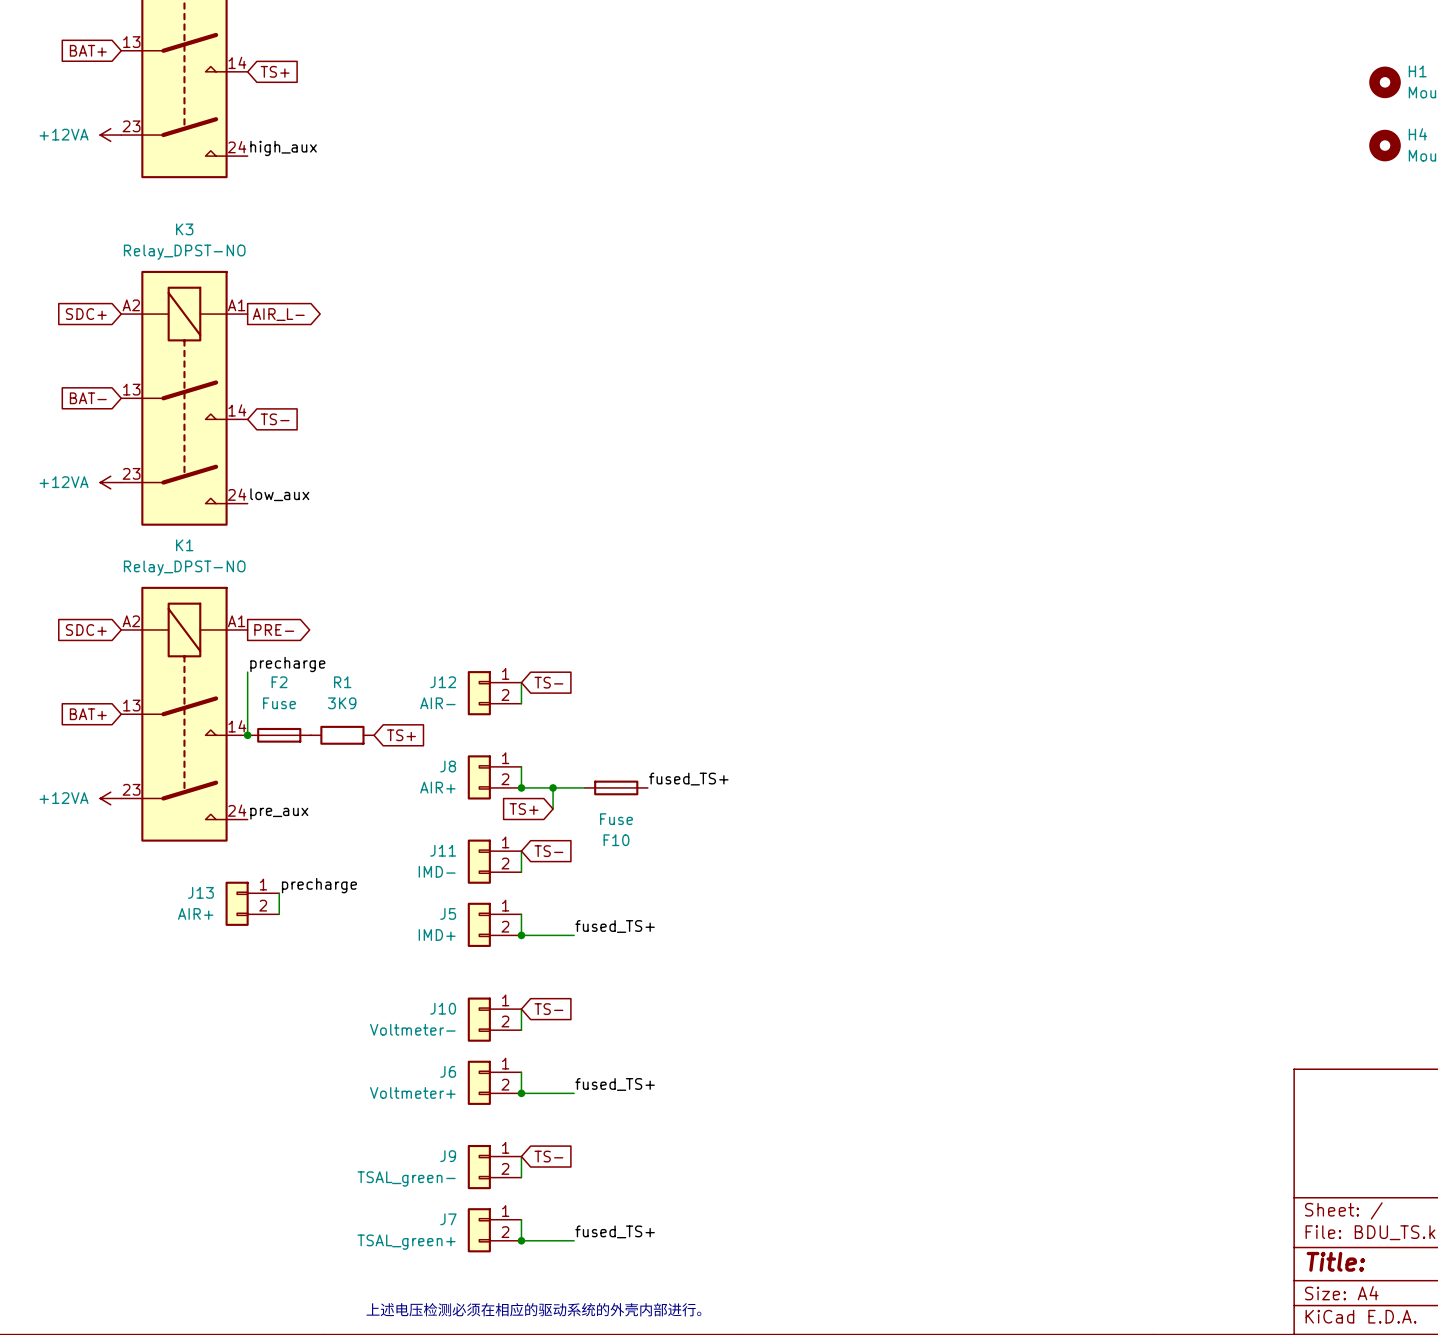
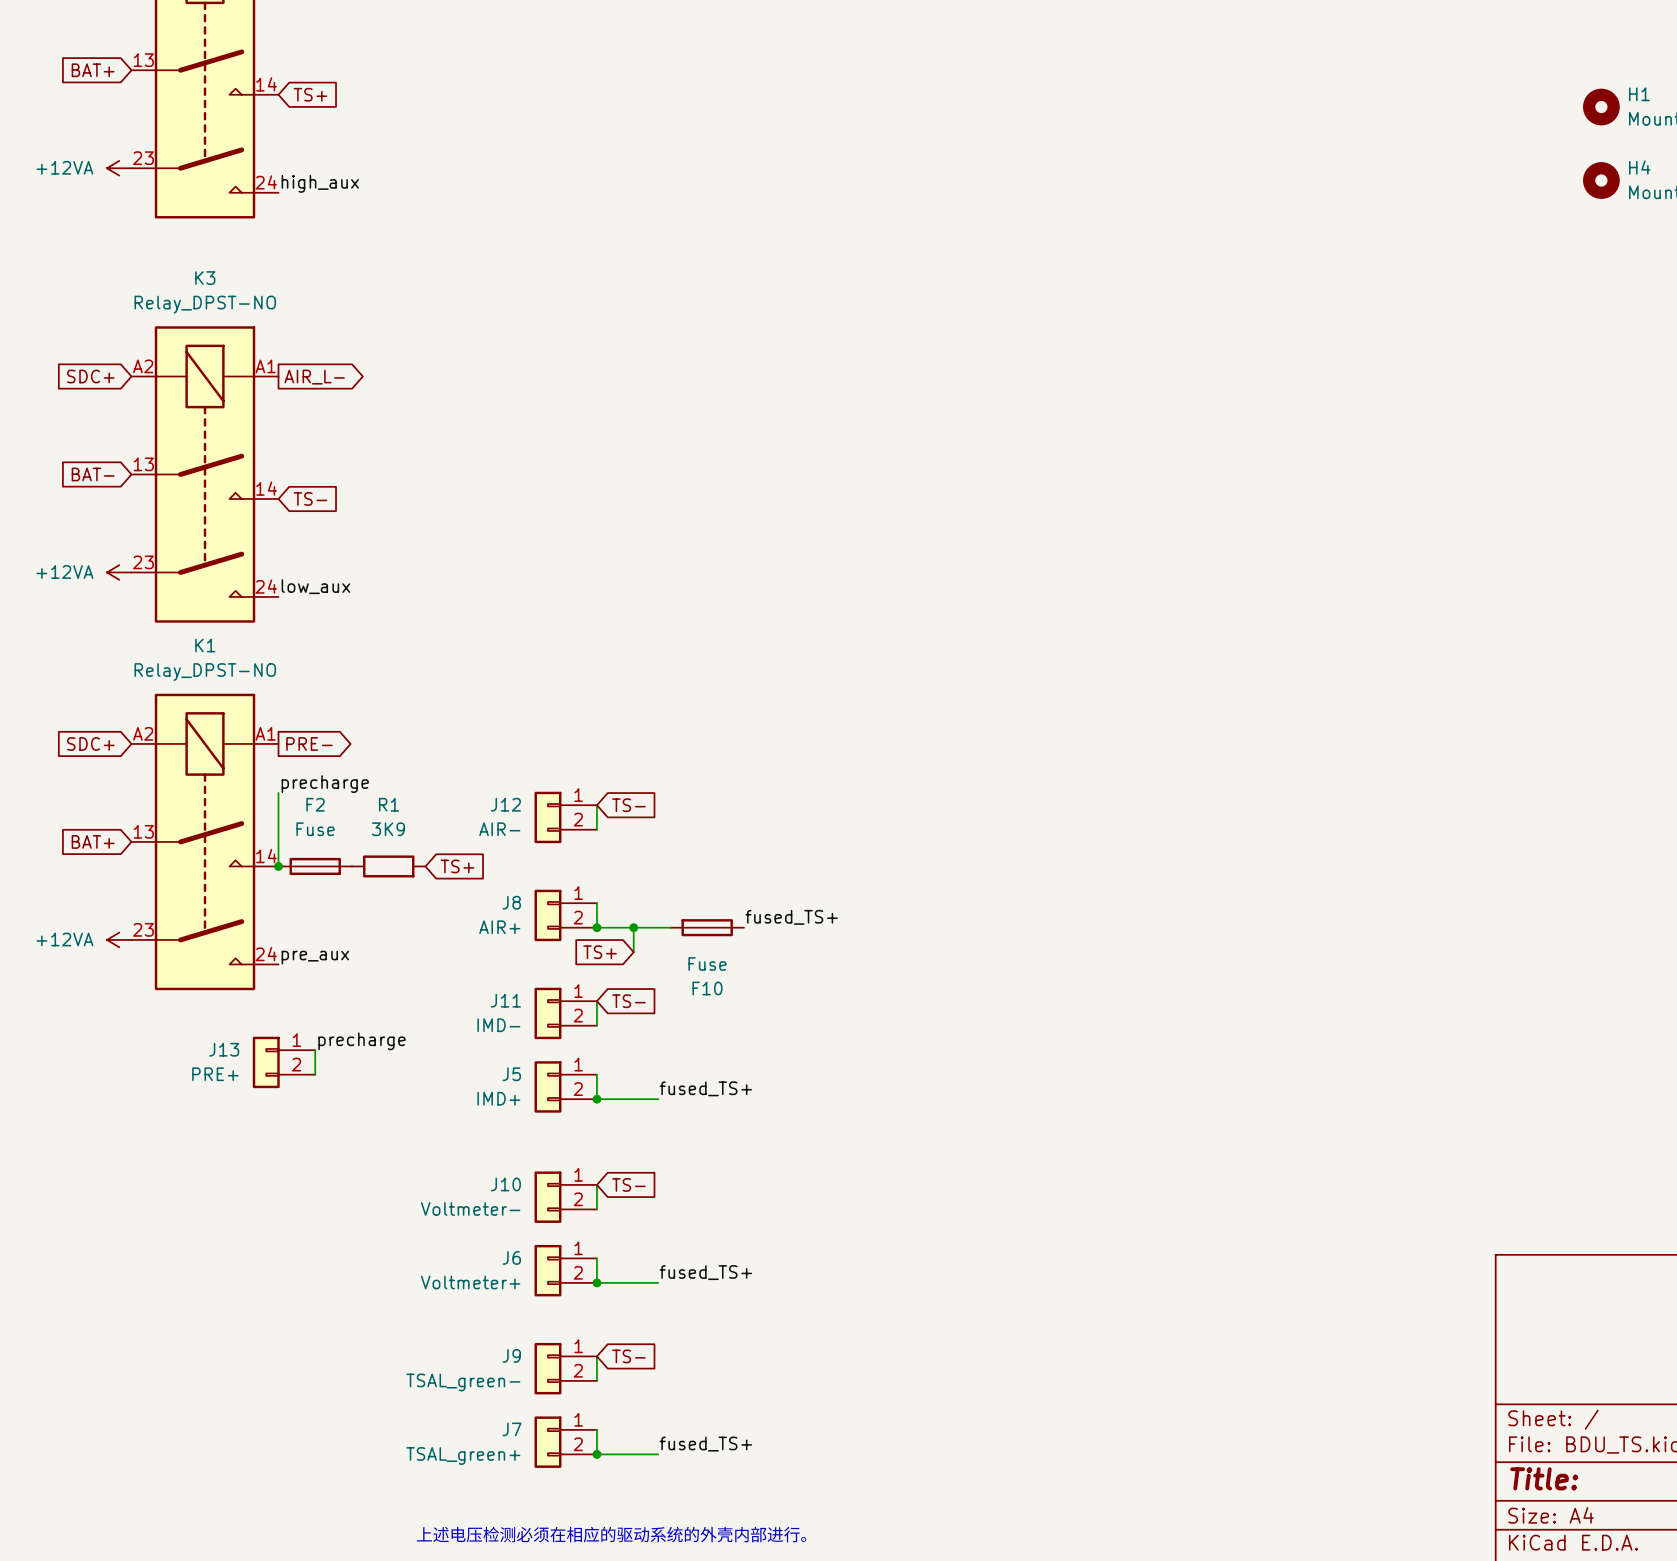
J13 value: AIR+ (195, 913) -> PRE+ (215, 1074)

